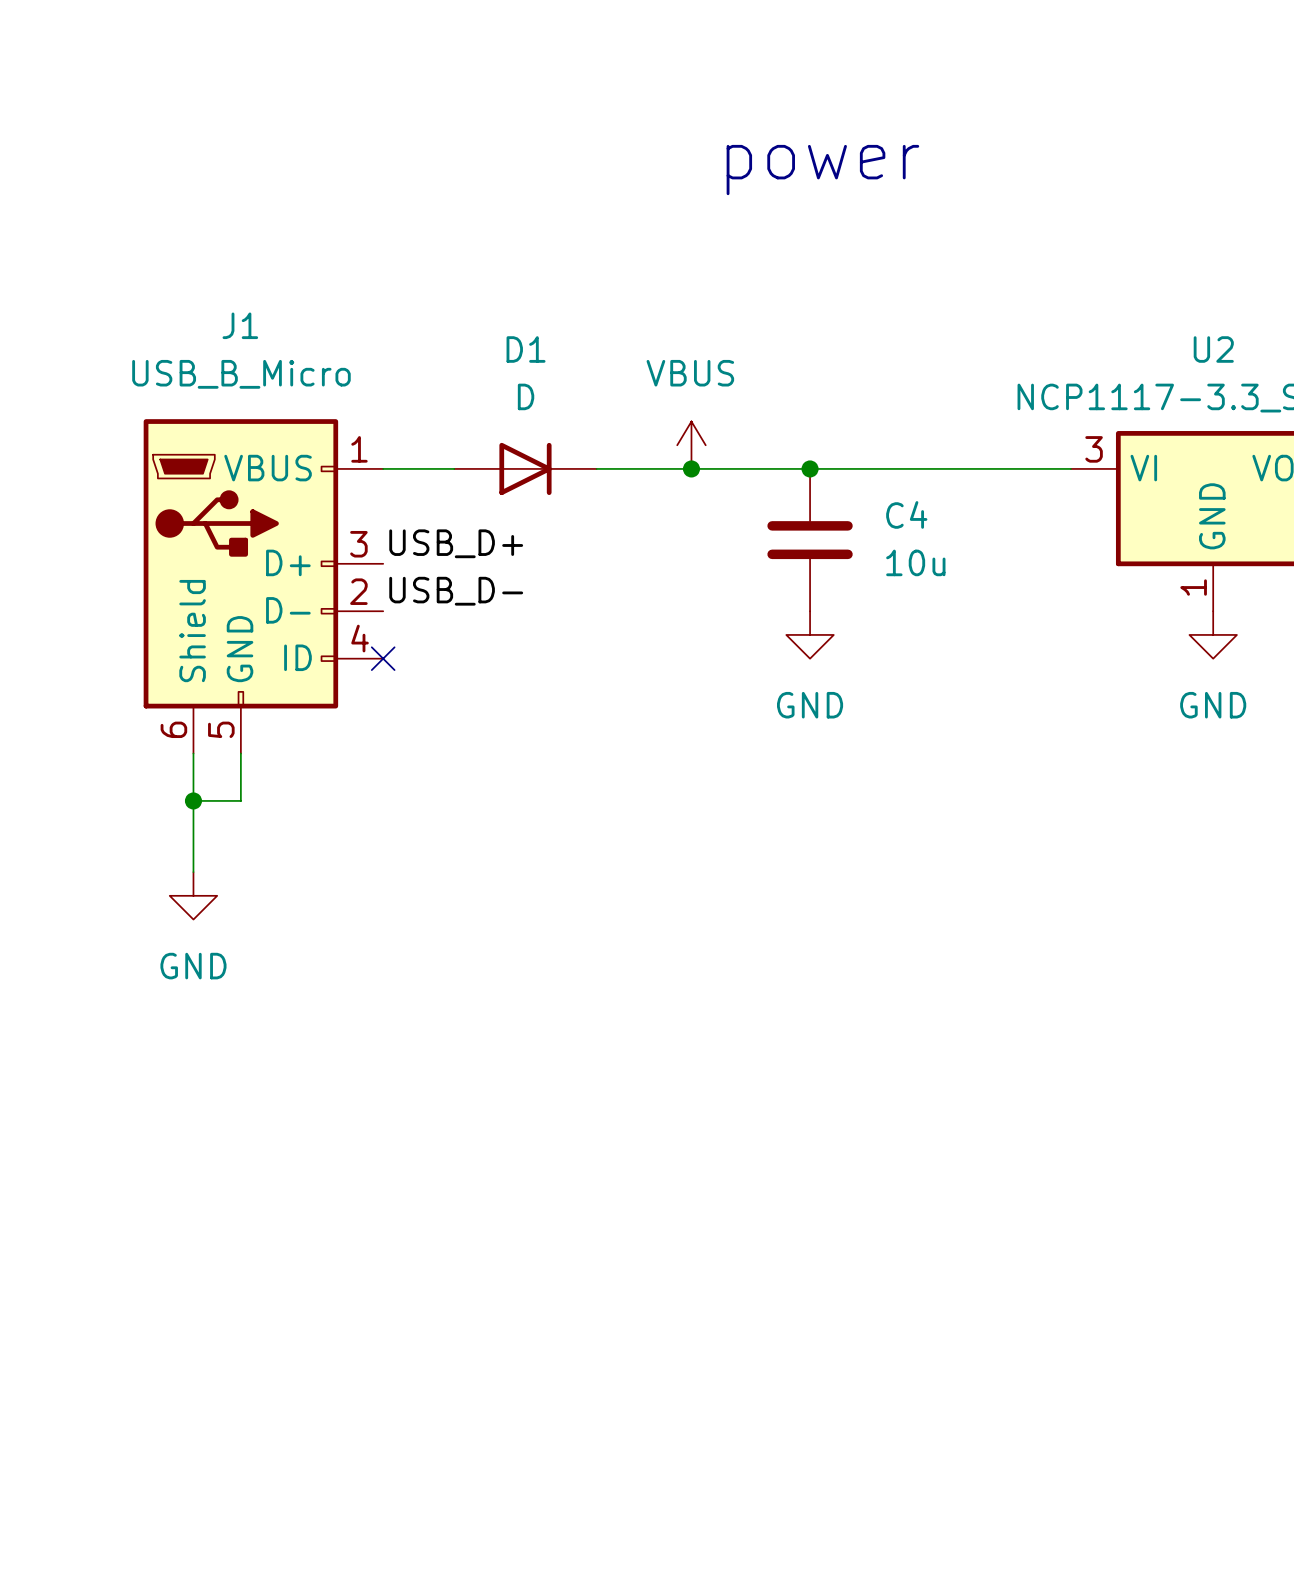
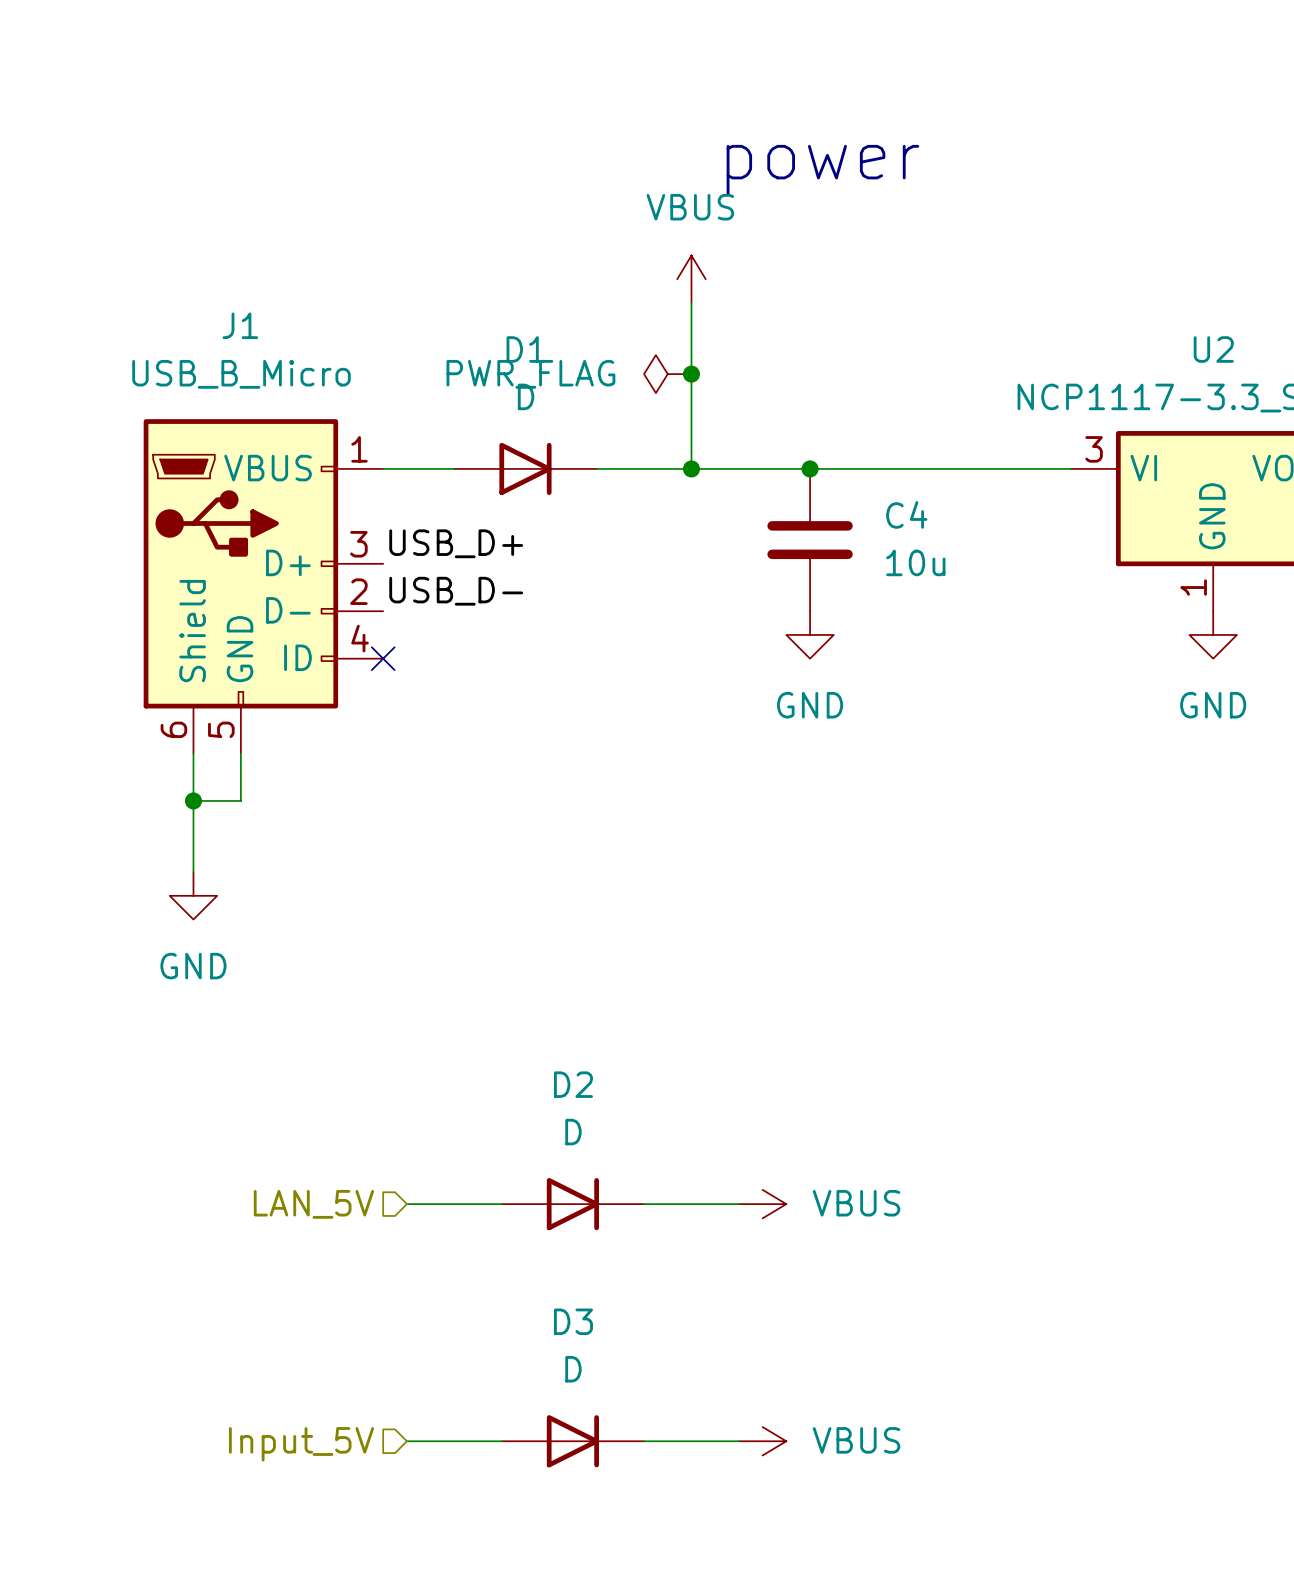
wire: none -> (691, 302) (691, 468)
power symbol: none -> PWR_FLAG (667, 374)
junction: none -> (691, 374)
power symbol position: VBUS (691, 445) -> VBUS (691, 279)
hierarchical label: none -> LAN_5V (313, 1204)
wire: none -> (406, 1204) (501, 1204)
D2: none -> D (572, 1204)
wire: none -> (644, 1204) (738, 1204)
power symbol: none -> VBUS (762, 1204)
wire: none -> (406, 1441) (501, 1441)
D3: none -> D (572, 1441)
wire: none -> (644, 1441) (738, 1441)
power symbol: none -> VBUS (762, 1441)
hierarchical label: none -> Input_5V (301, 1444)

